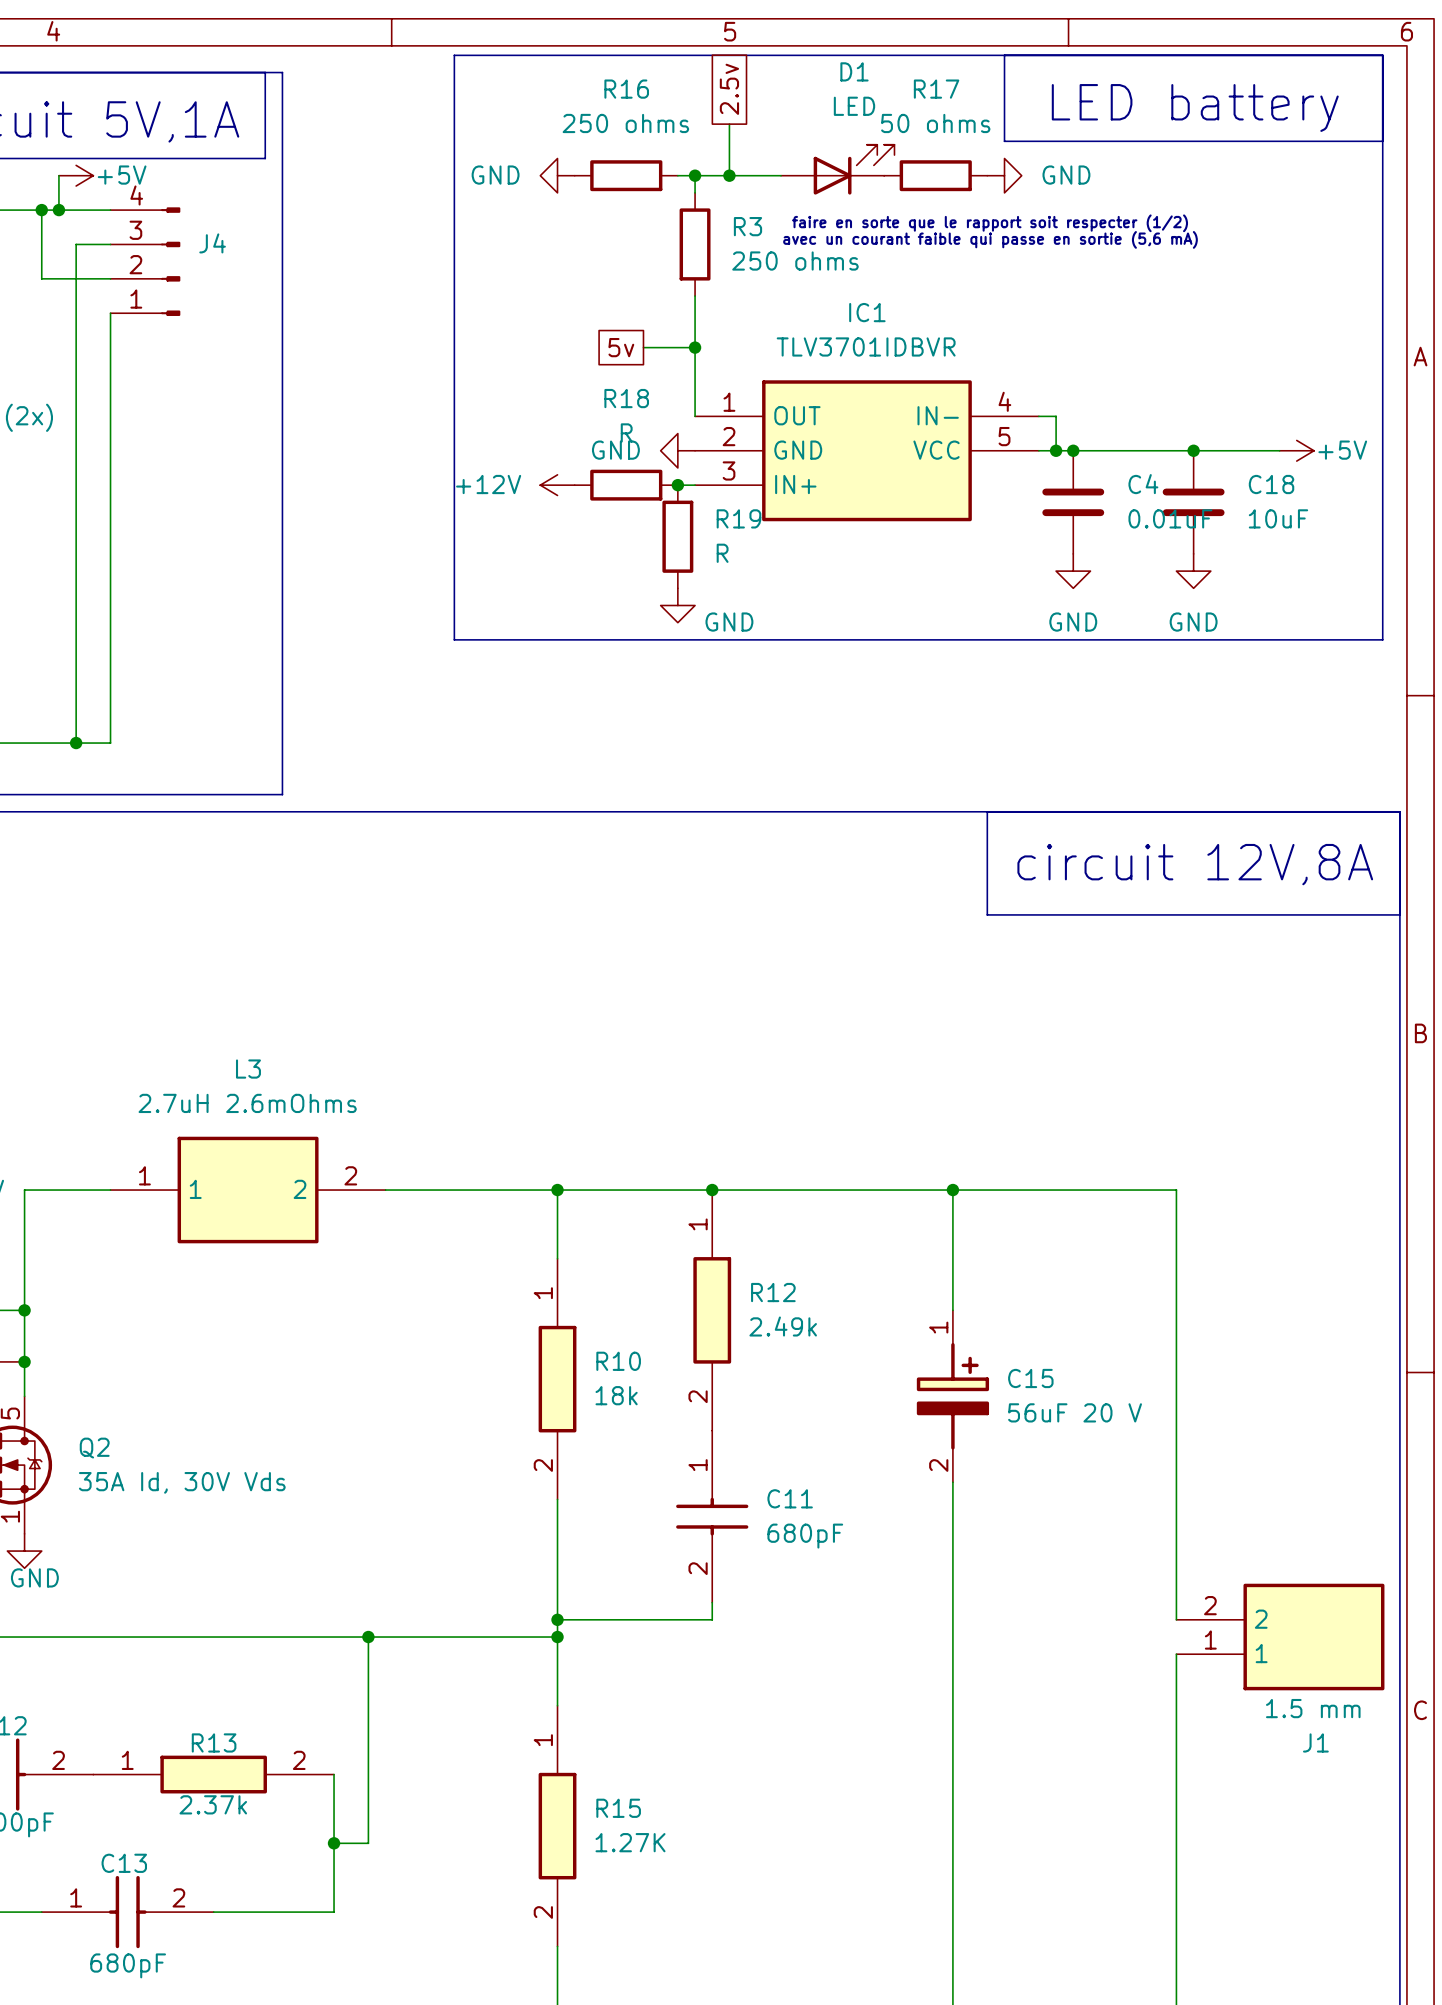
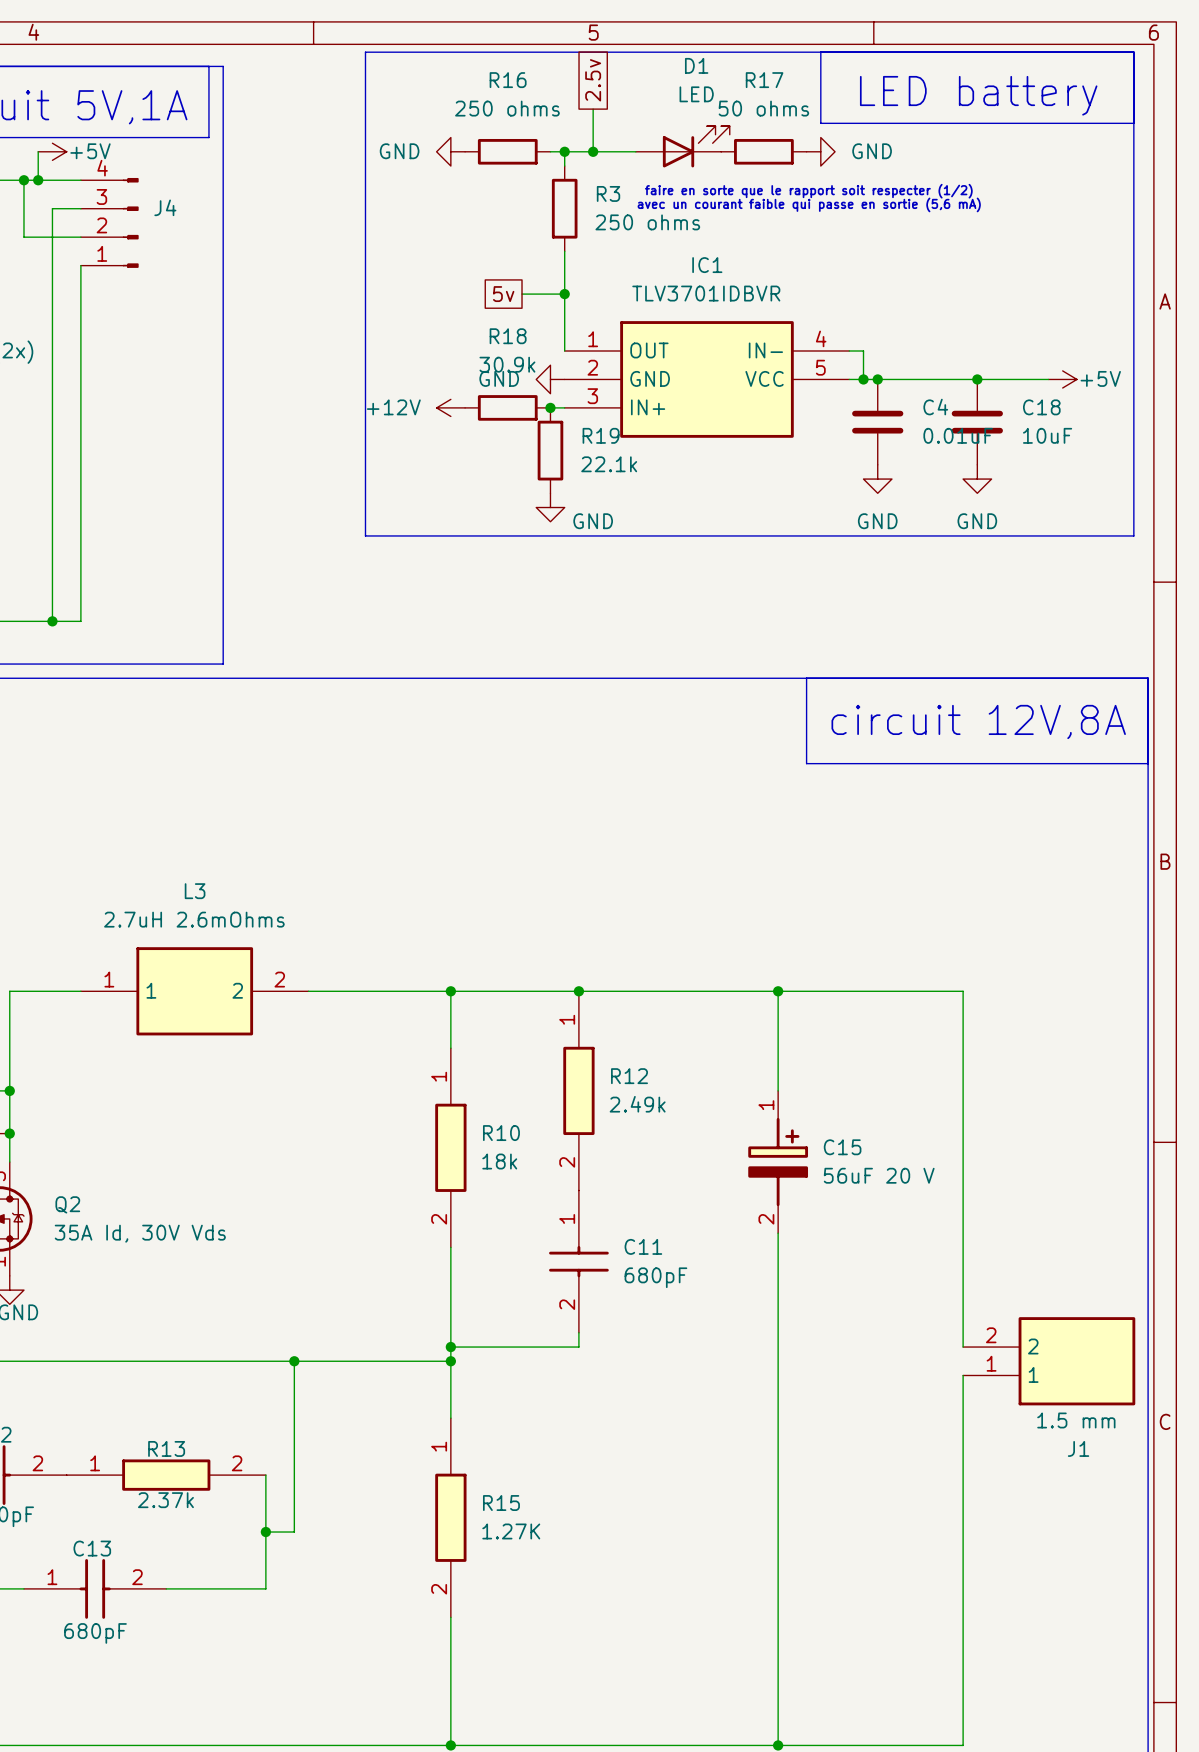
R18 value: R (626, 432) -> 30.9k (507, 364)
R19 value: R (722, 553) -> 22.1k (609, 464)

